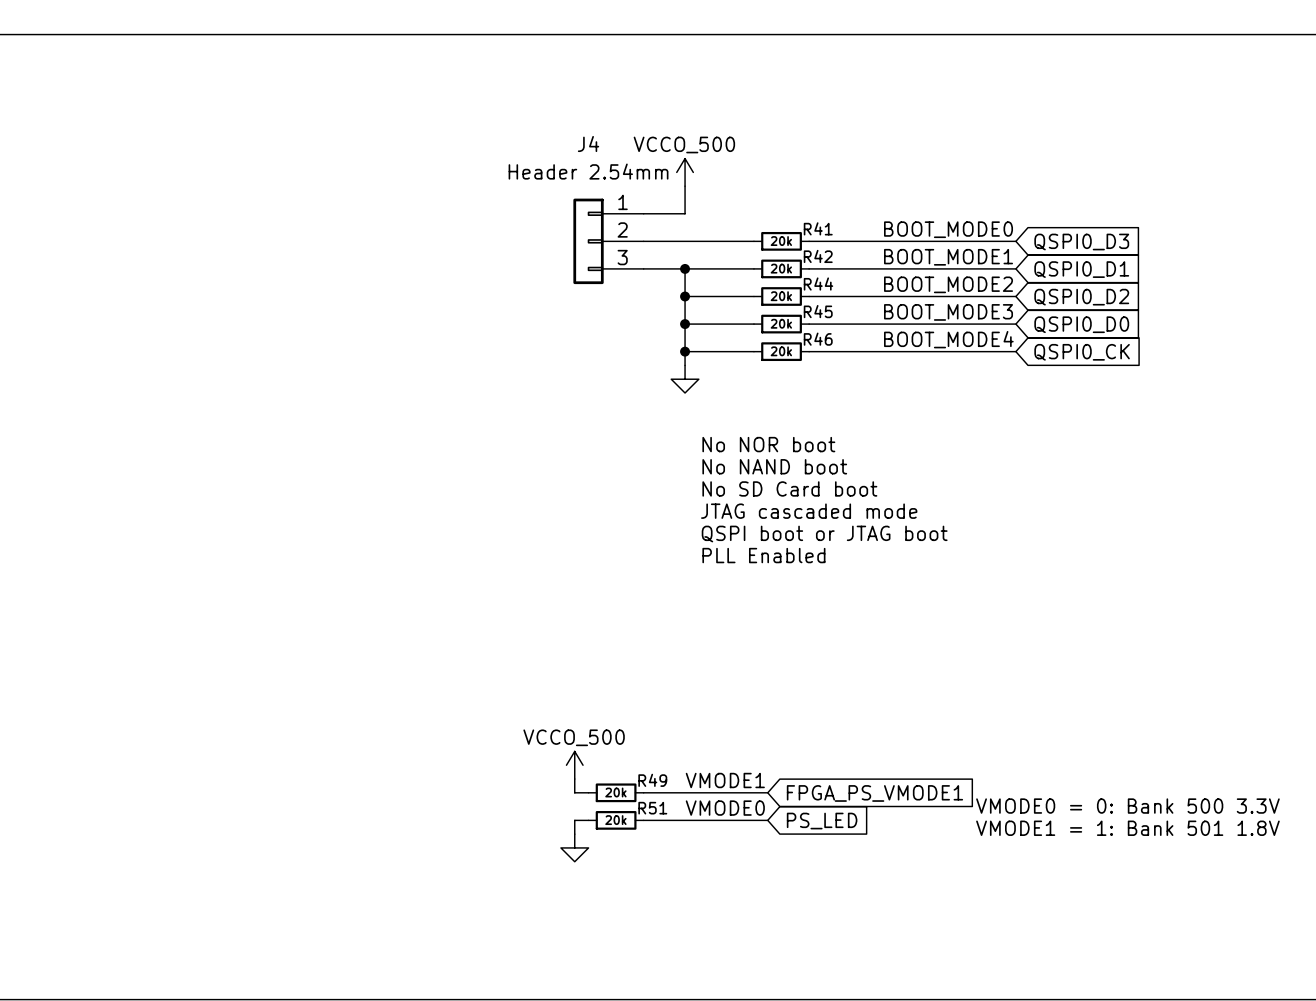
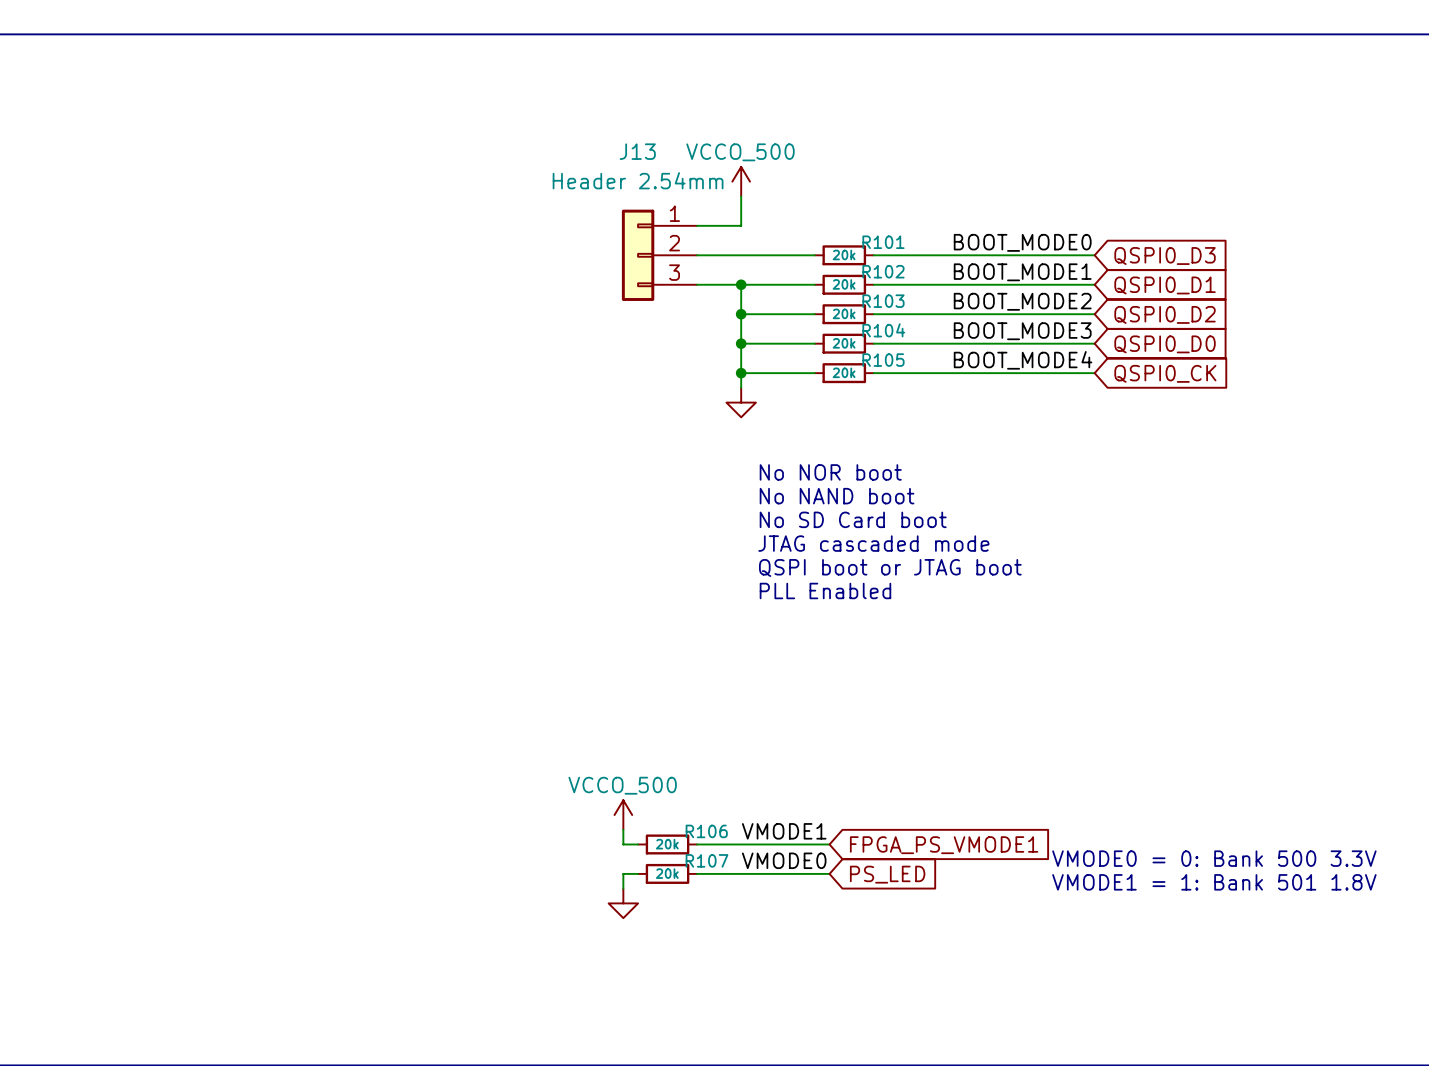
J4 name: J4 (588, 144) -> J13 (637, 151)
R41 name: R41 (818, 228) -> R101 (883, 242)
R42 name: R42 (818, 256) -> R102 (883, 271)
R44 name: R44 (818, 284) -> R103 (883, 301)
R45 name: R45 (818, 311) -> R104 (883, 330)
R46 name: R46 (818, 339) -> R105 (883, 360)
R49 name: R49 (652, 780) -> R106 (706, 831)
R51 name: R51 (652, 808) -> R107 (707, 860)

